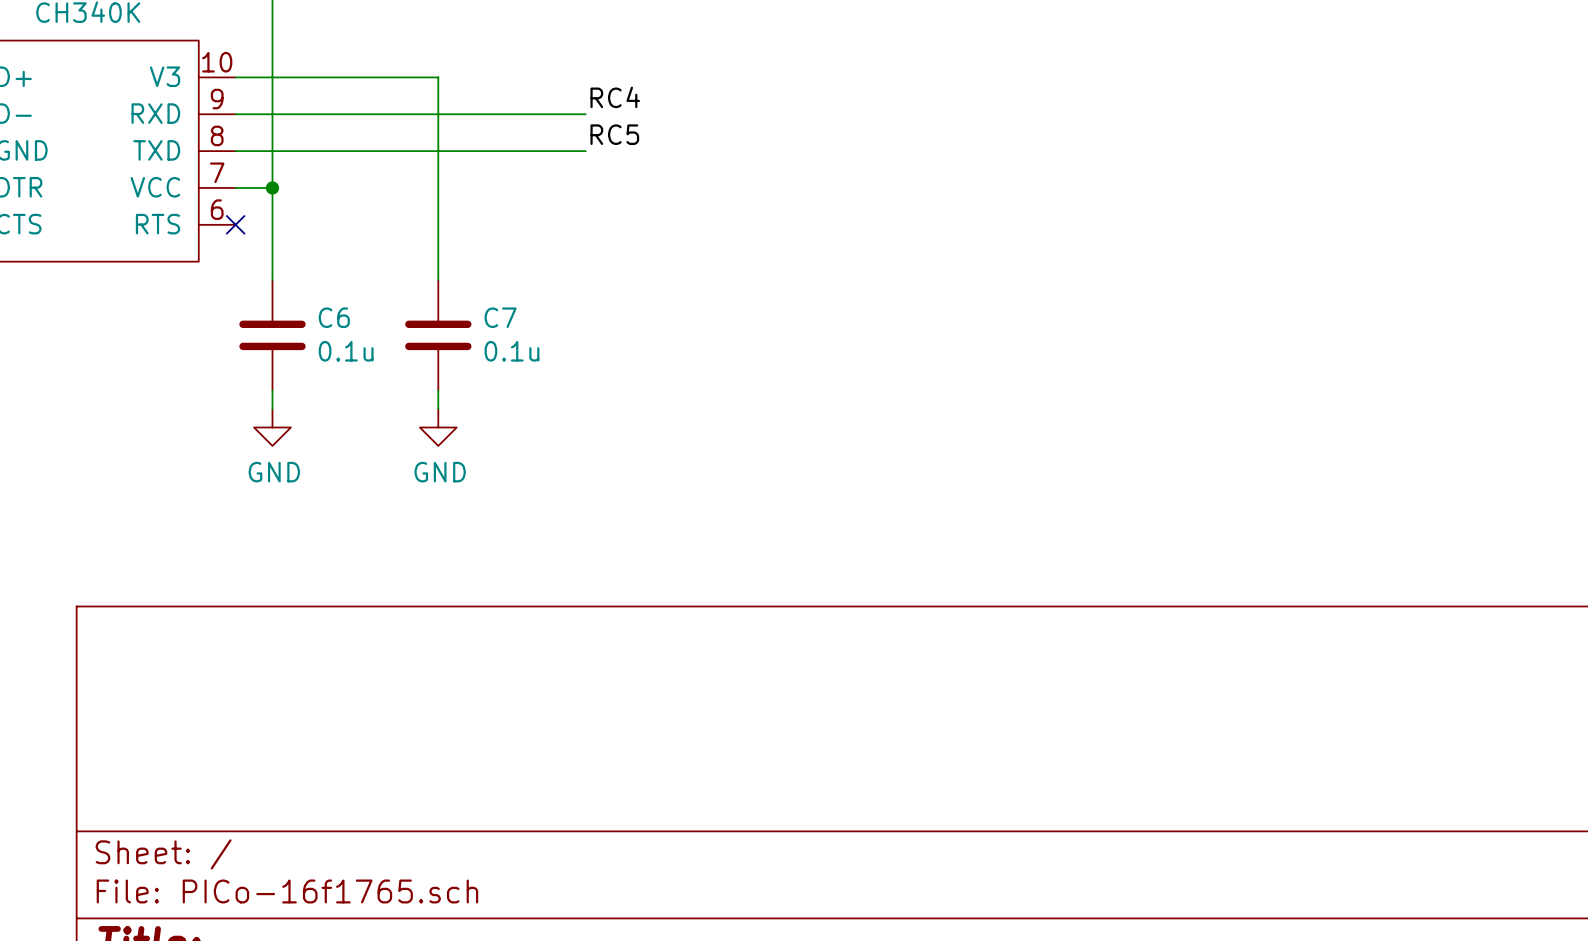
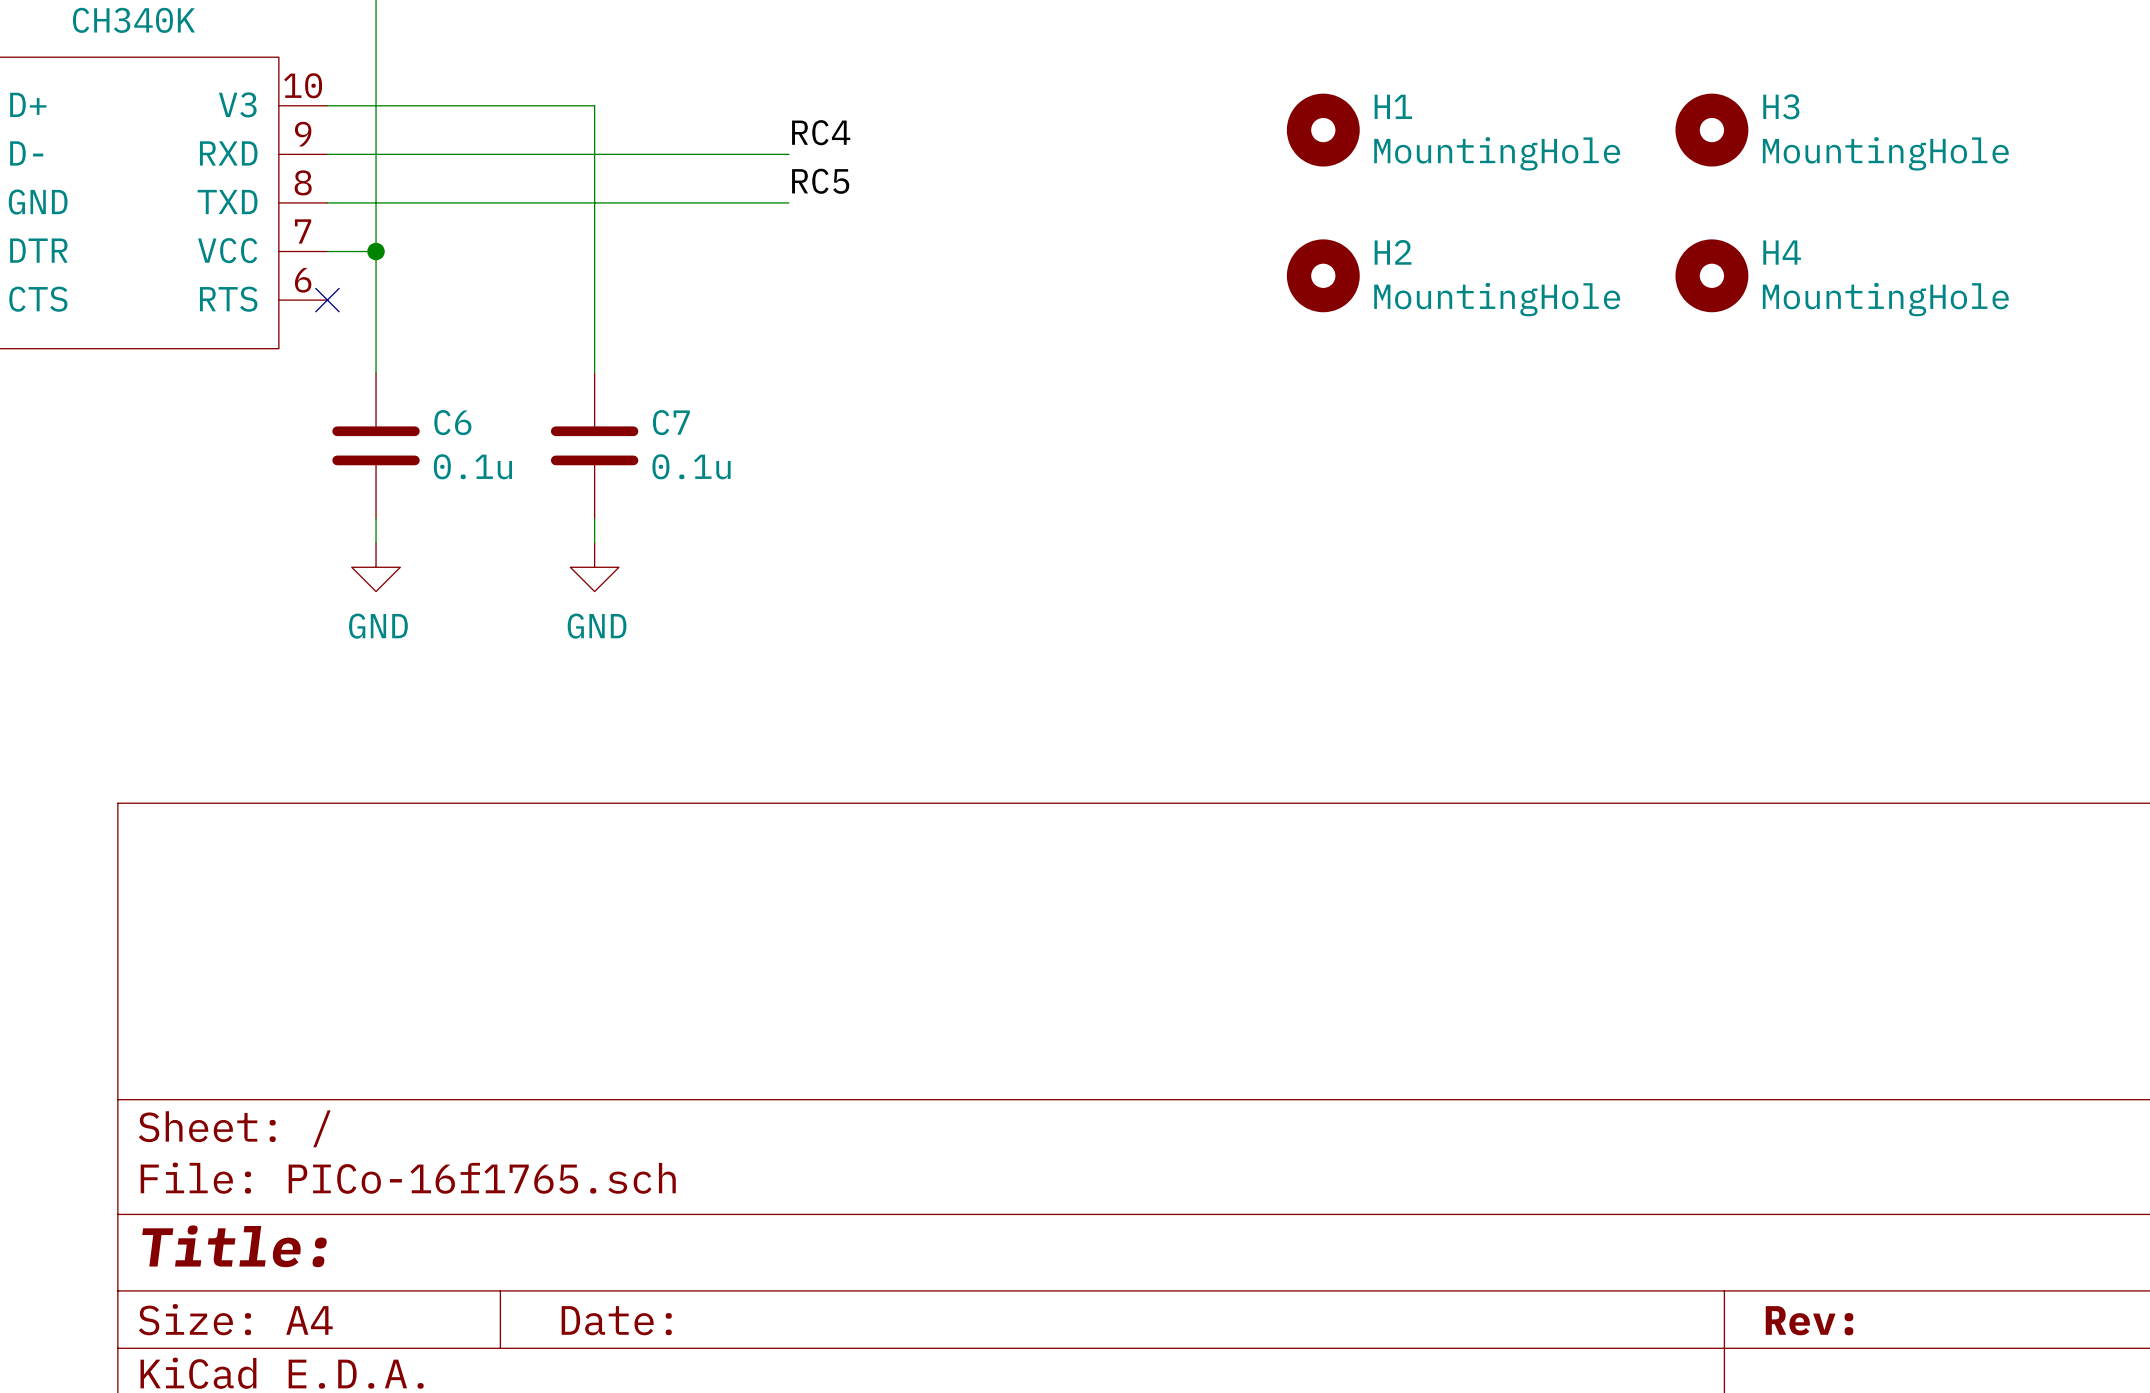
H1: none -> MountingHole (1323, 130)
H3: none -> MountingHole (1711, 130)
H2: none -> MountingHole (1323, 275)
H4: none -> MountingHole (1711, 275)

